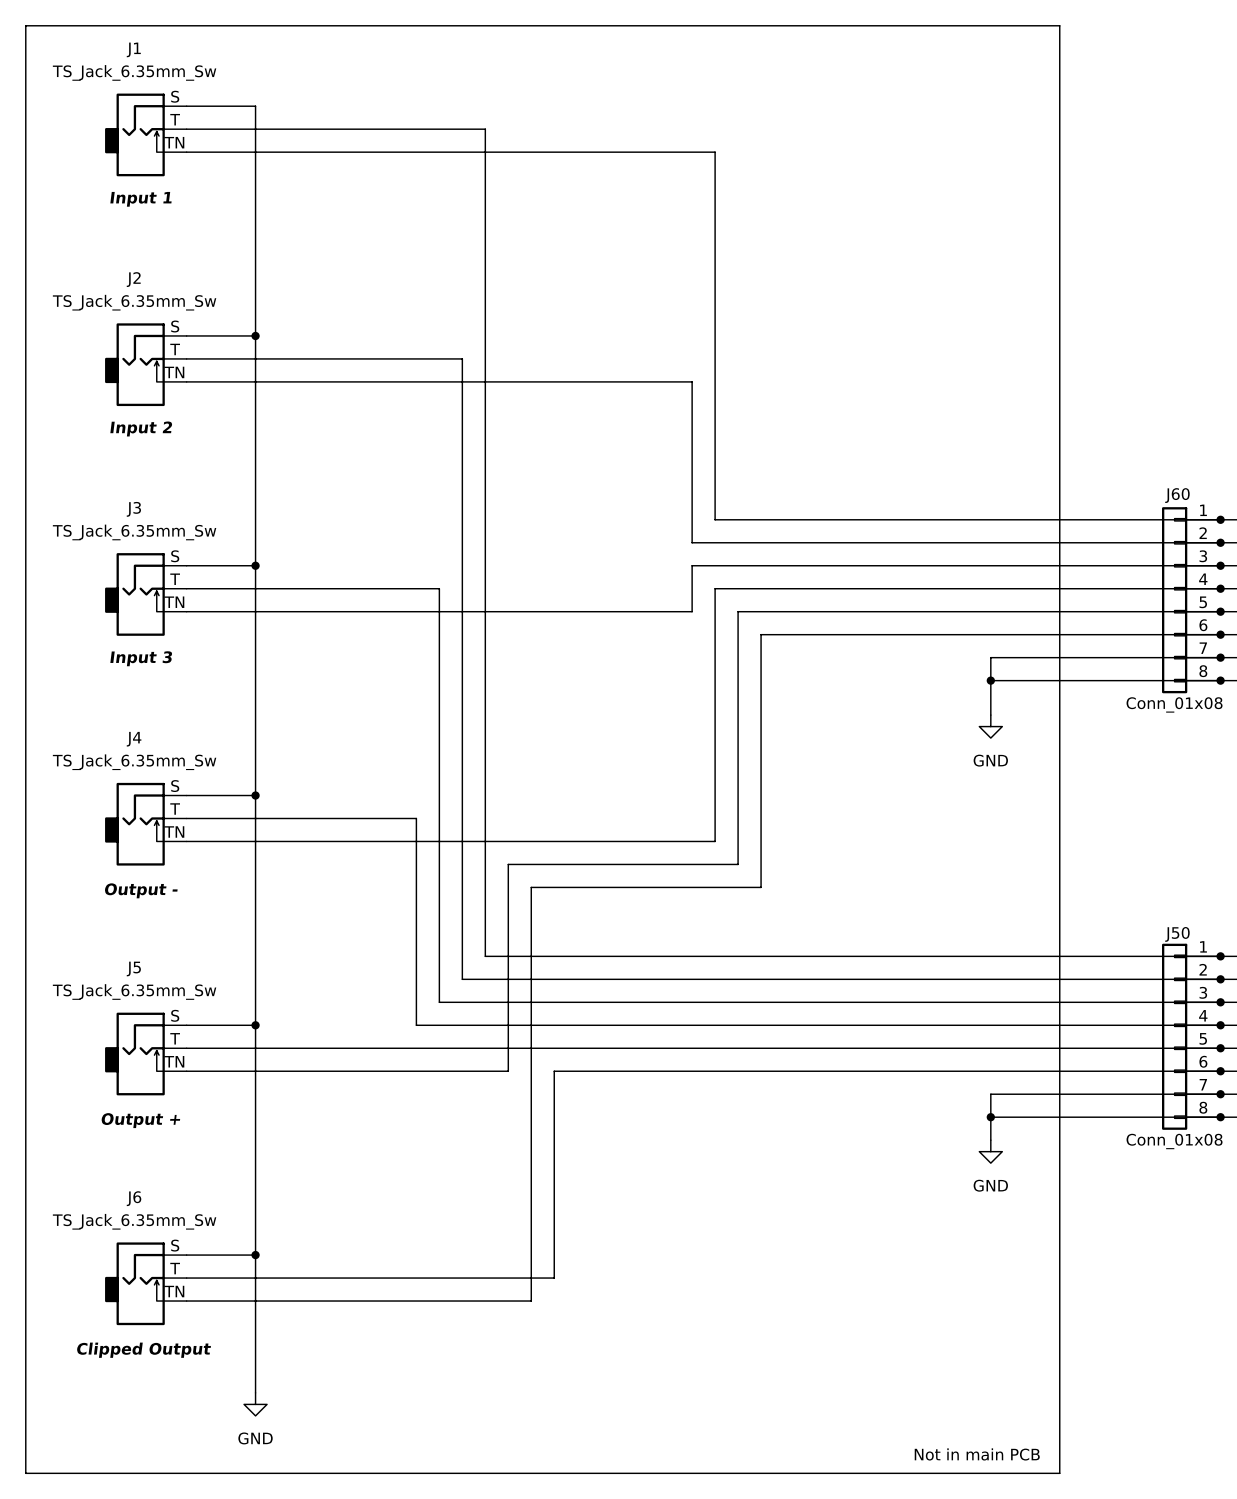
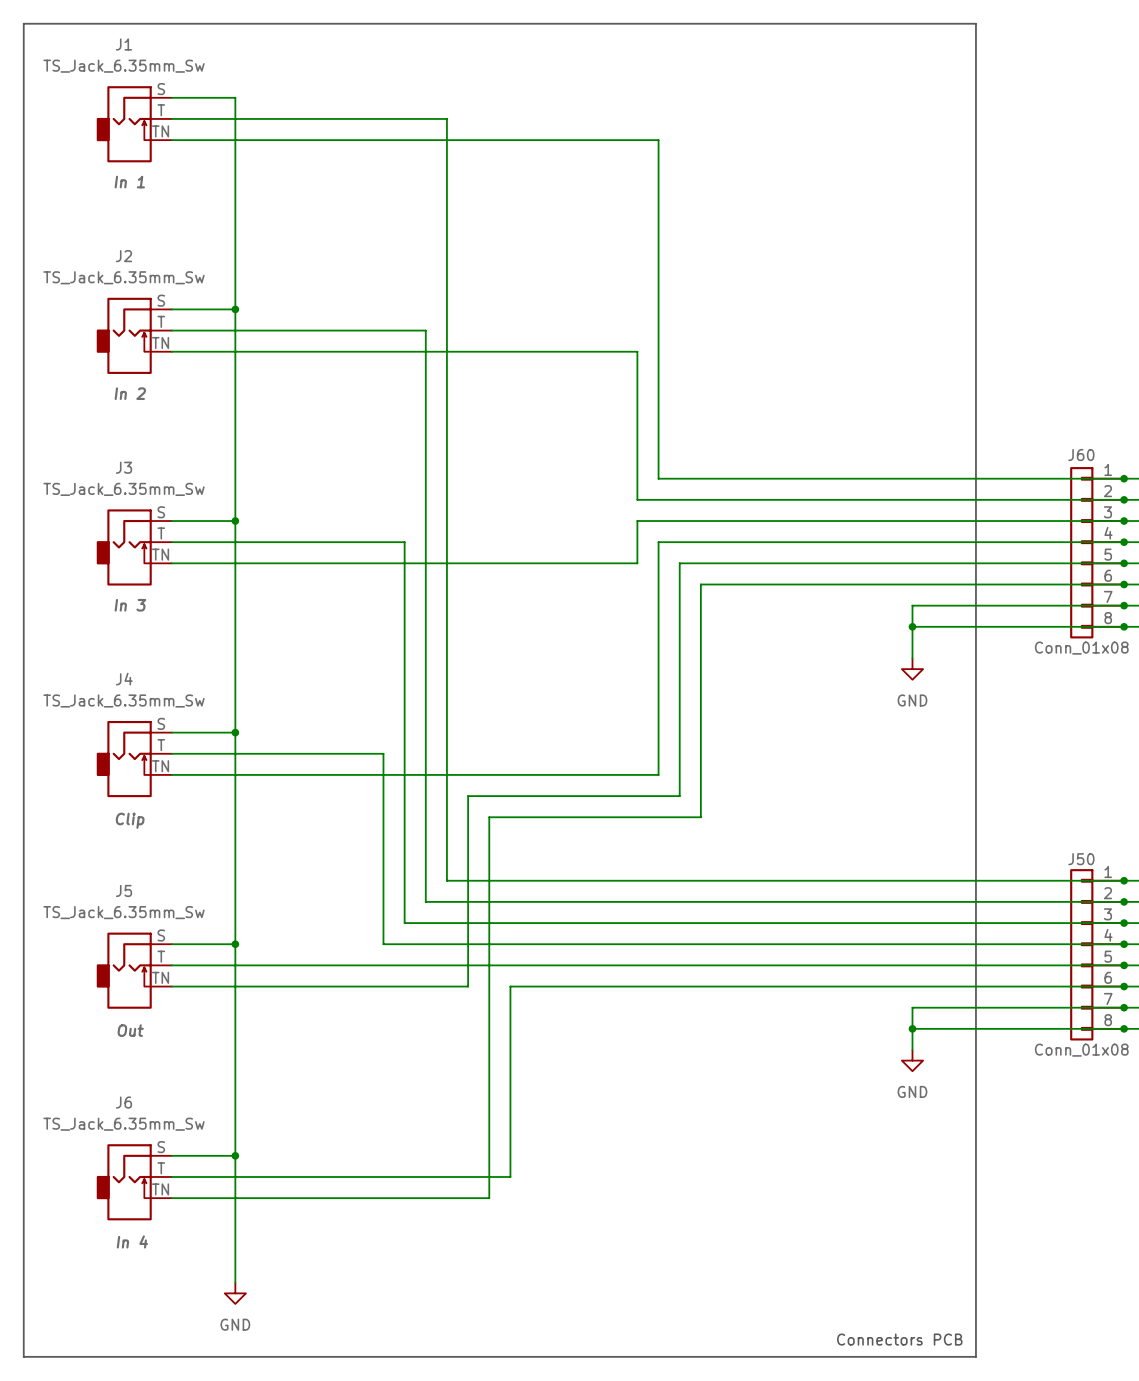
J1 text: Input 1 (140, 199) -> In 1 (129, 182)
J2 text: Input 2 (141, 428) -> In 2 (130, 393)
J3 text: Input 3 (141, 658) -> In 3 (130, 605)
J4 text: Output - (141, 890) -> Clip (130, 820)
J5 text: Output + (140, 1120) -> Out (130, 1030)
J6 text: Clipped Output (143, 1350) -> In 4 (132, 1241)
text: Not in main PCB (977, 1454) -> Connectors PCB (899, 1339)

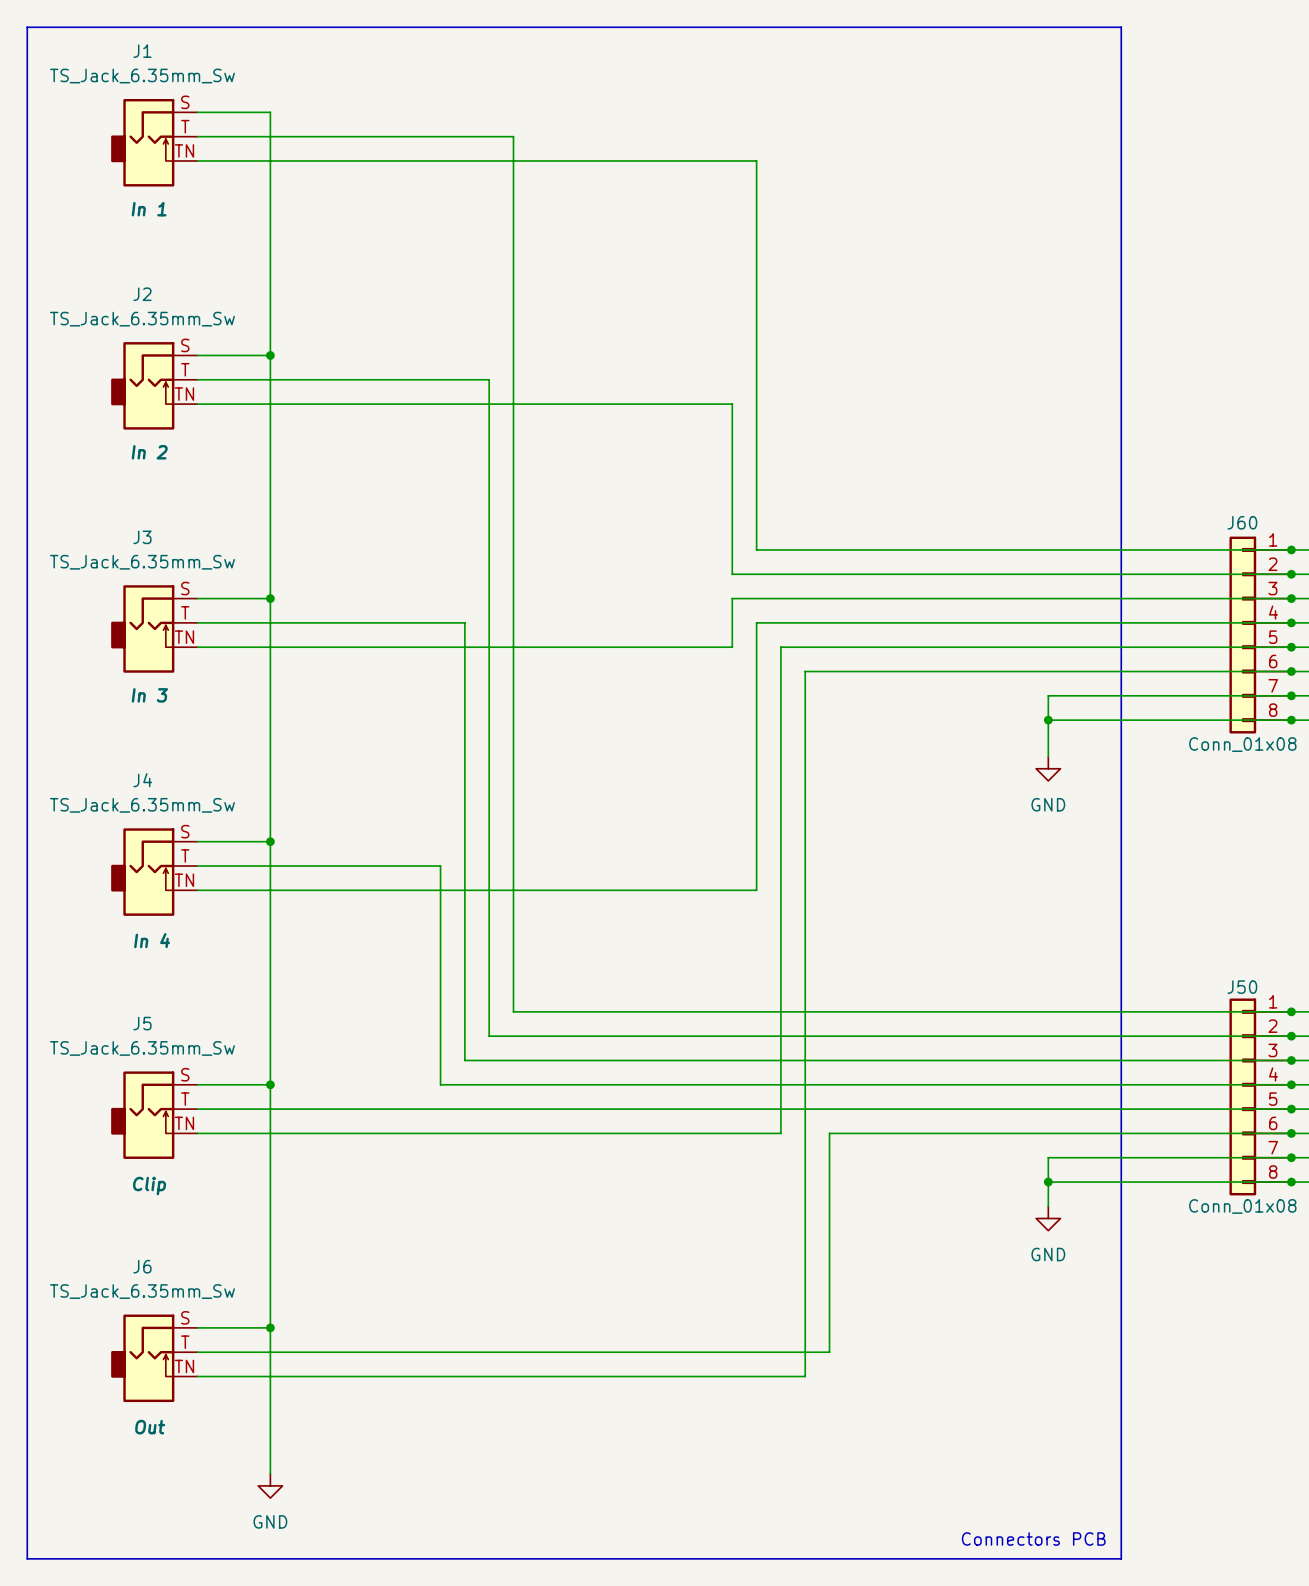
wire: (679, 796) (468, 796) (468, 986) -> none
wire: (700, 817) (489, 817) (489, 1198) -> (805, 938) (805, 1376) (562, 1376)
J4 text: Clip (130, 820) -> In 4 (152, 940)
wire: (510, 986) (510, 1176) -> (586, 1133) (537, 1133)
wire: (679, 986) (722, 986) -> (780, 1133) (780, 914)
wire: none -> (829, 1133) (829, 1352) (586, 1352)
J5 text: Out (130, 1030) -> Clip (149, 1186)
J6 text: In 4 (132, 1241) -> Out (150, 1427)

